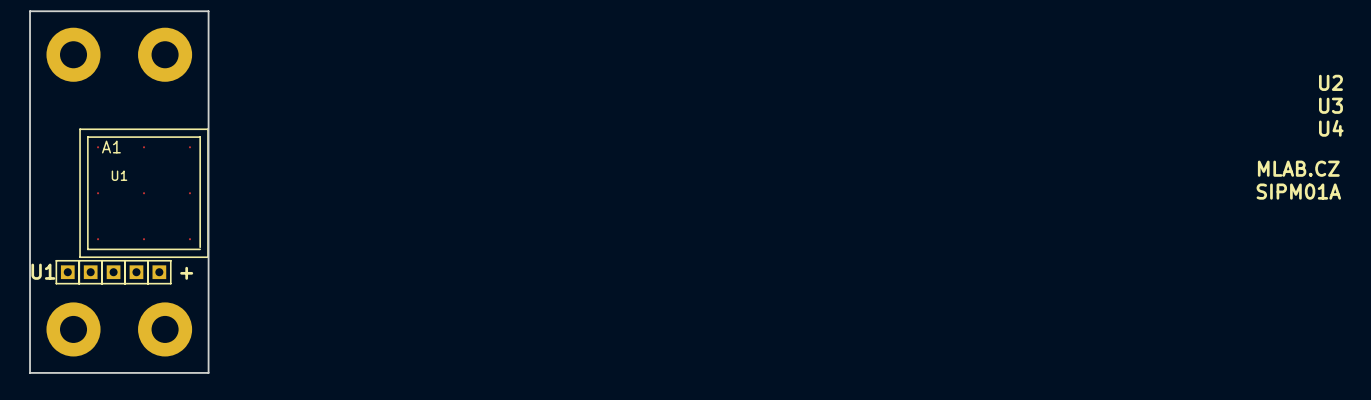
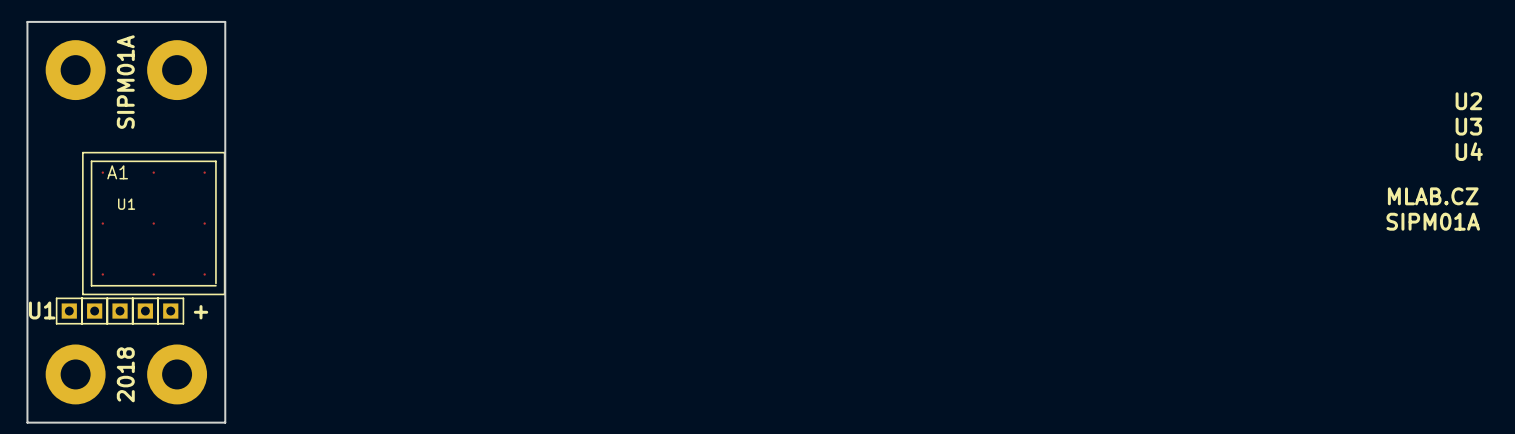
text: none -> SIPM01A (125, 82)
text: none -> 2018 (125, 374)

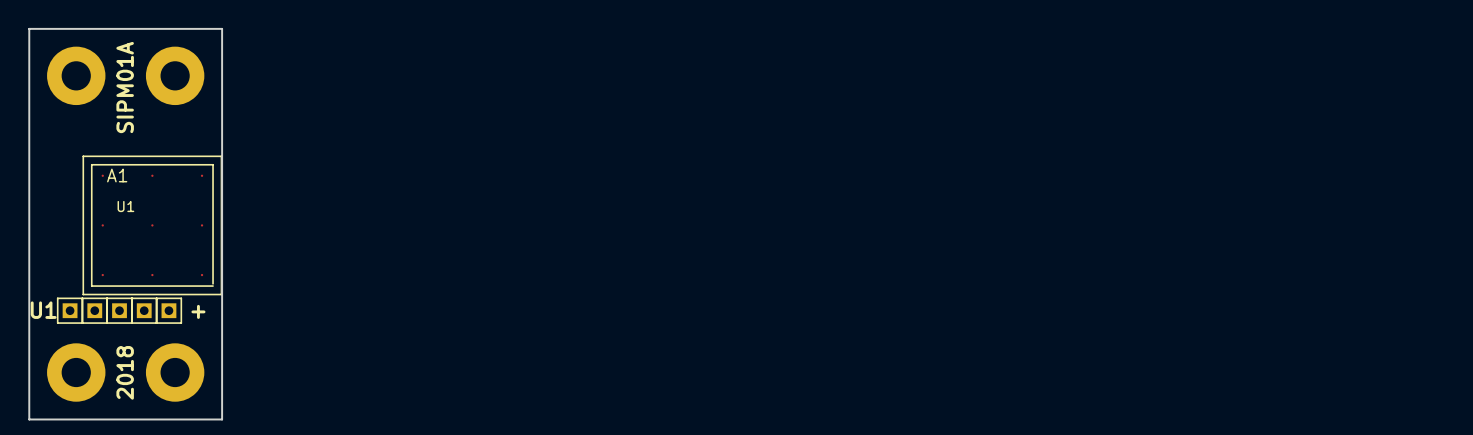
text: U2 (1468, 101) -> none
text: U3 (1468, 126) -> none
text: U4 (1469, 151) -> none
text: MLAB.CZ (1433, 196) -> none
text: SIPM01A (1433, 221) -> none

